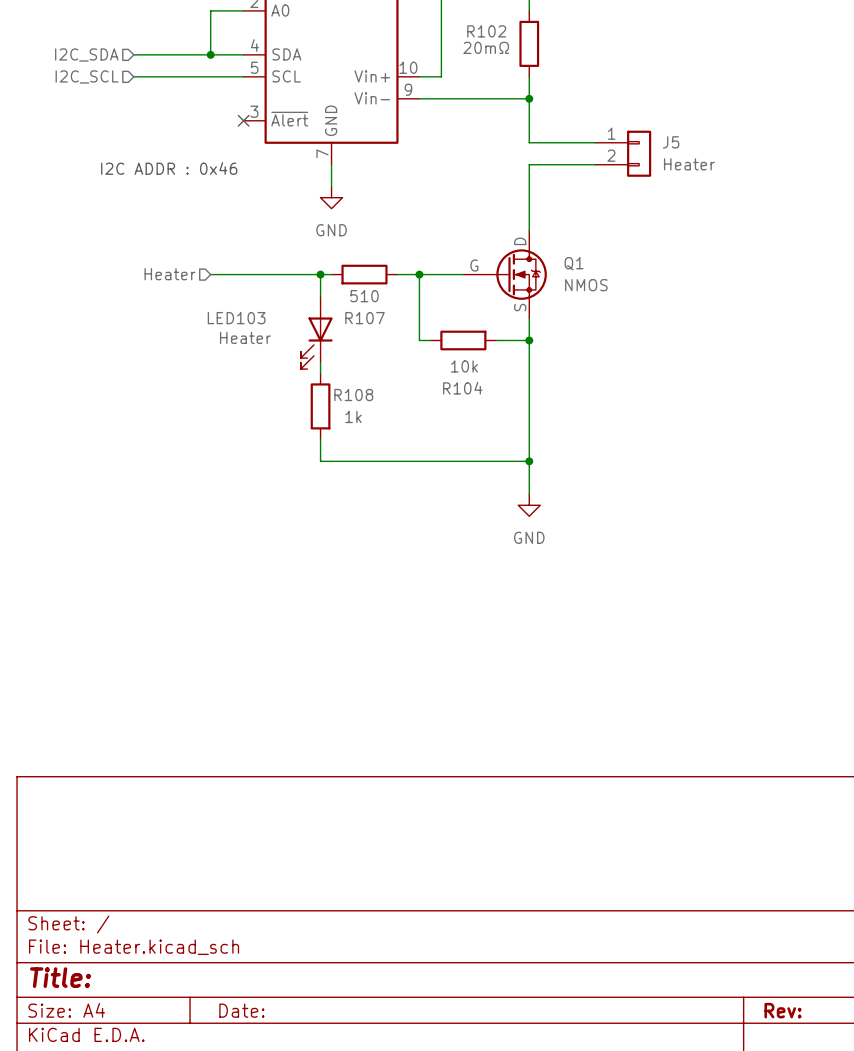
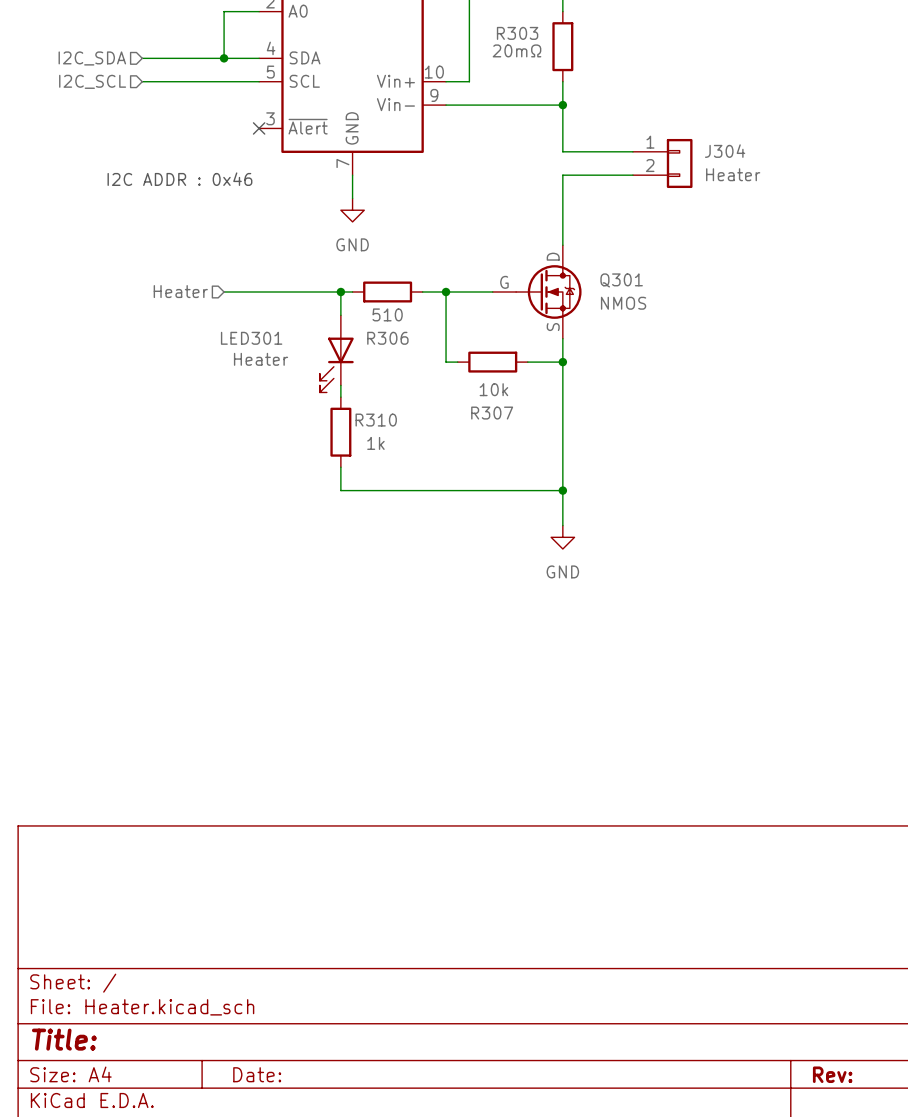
R102 name: R102 (486, 31) -> R303 (517, 33)
J5 name: J5 (671, 142) -> J304 (725, 151)
Q1 name: Q1 (574, 263) -> Q301 (621, 280)
LED103 name: LED103 (236, 318) -> LED301 (251, 338)
R107 name: R107 (365, 318) -> R306 (387, 338)
R104 name: R104 (462, 388) -> R307 (492, 413)
R108 name: R108 (353, 395) -> R310 (376, 420)

